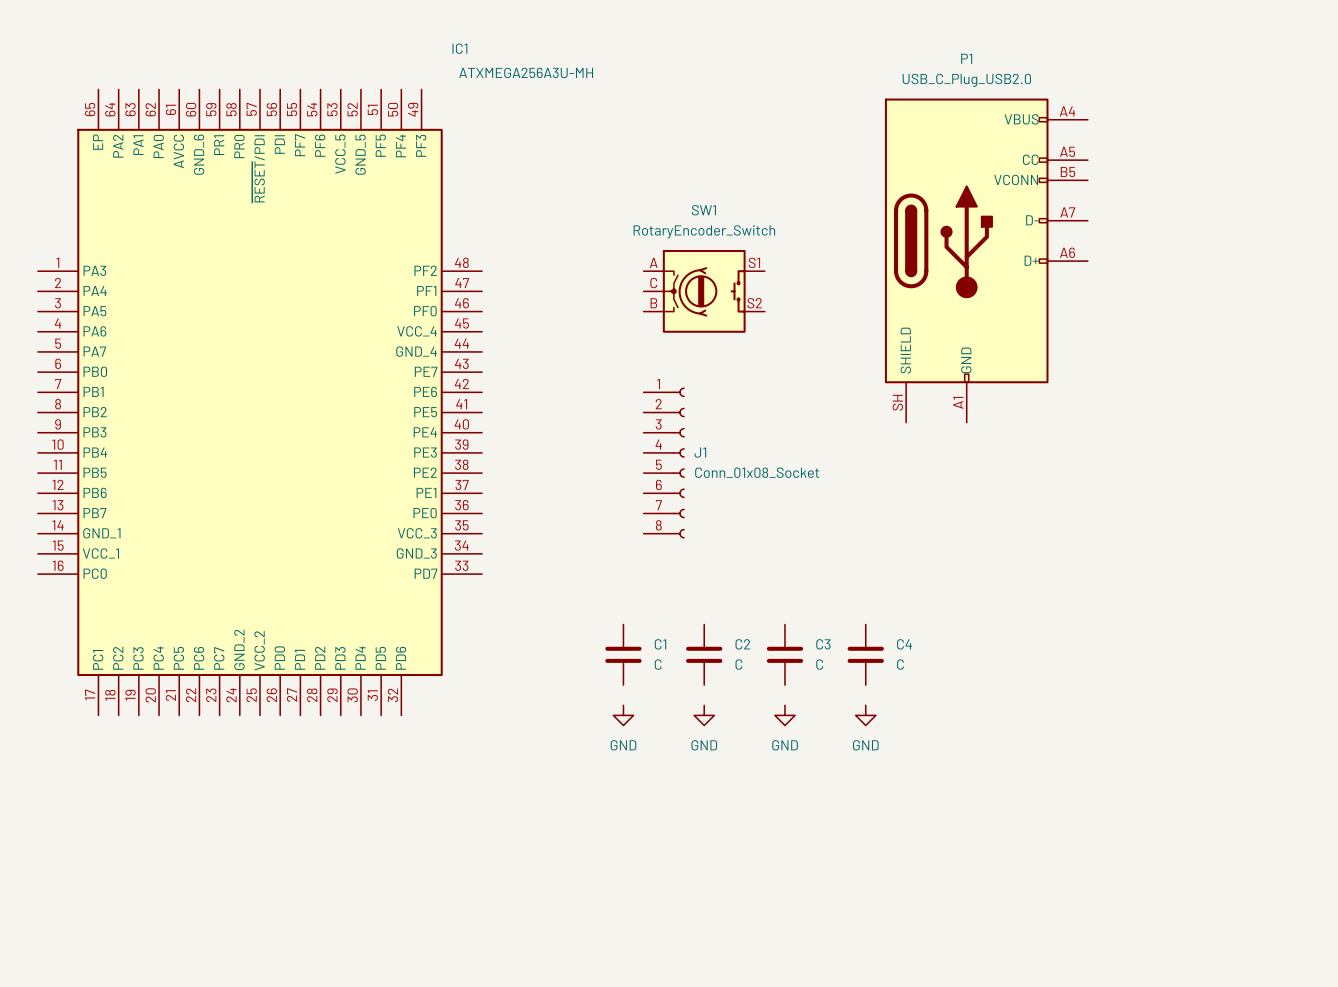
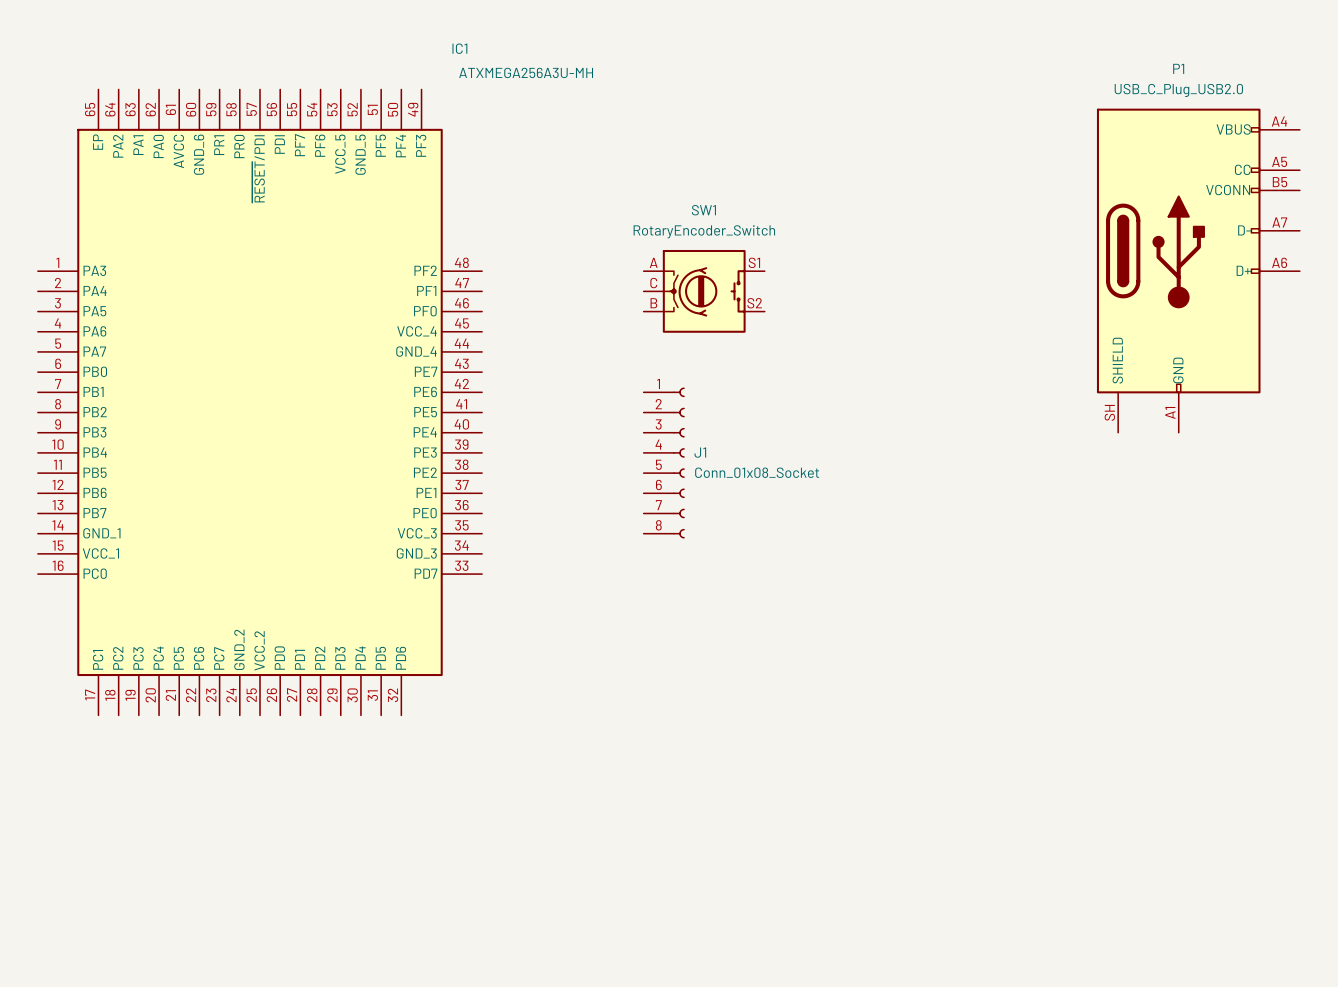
P1 position: (986, 260) -> (1198, 270)
C1: C (623, 654) -> none
C2: C (704, 654) -> none
C3: C (784, 654) -> none
C4: C (865, 654) -> none
power symbol: GND (623, 715) -> none
power symbol: GND (704, 715) -> none
power symbol: GND (784, 715) -> none
power symbol: GND (865, 715) -> none

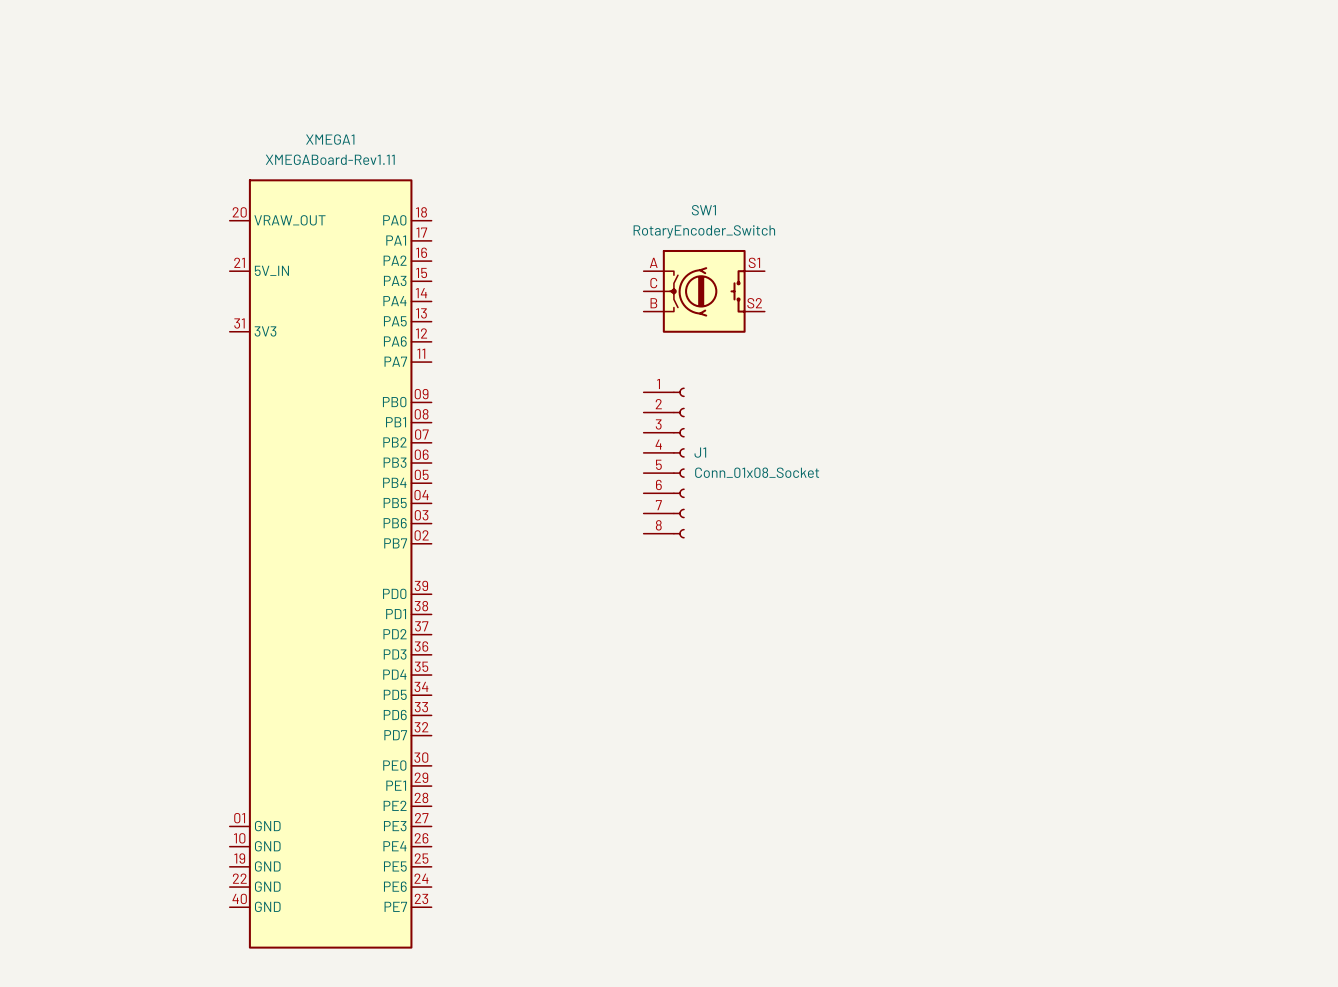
P1: USB_C_Plug_USB2.0 (1198, 270) -> none
IC1: ATXMEGA256A3U-MH (259, 402) -> none
XMEGA1: none -> XMEGABoard-Rev1.11 (330, 563)

